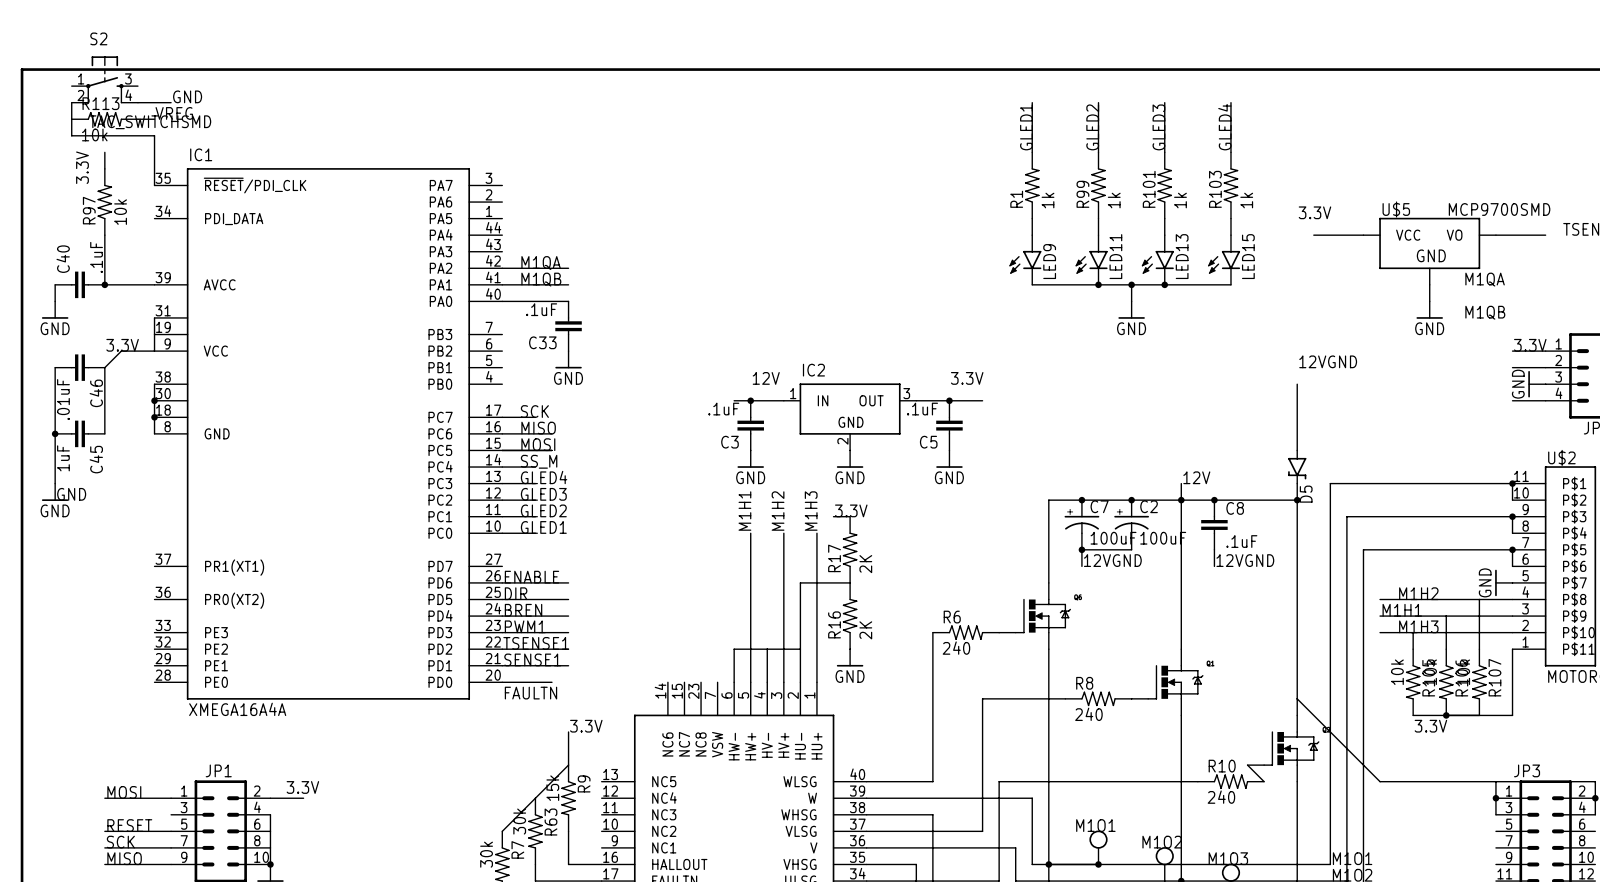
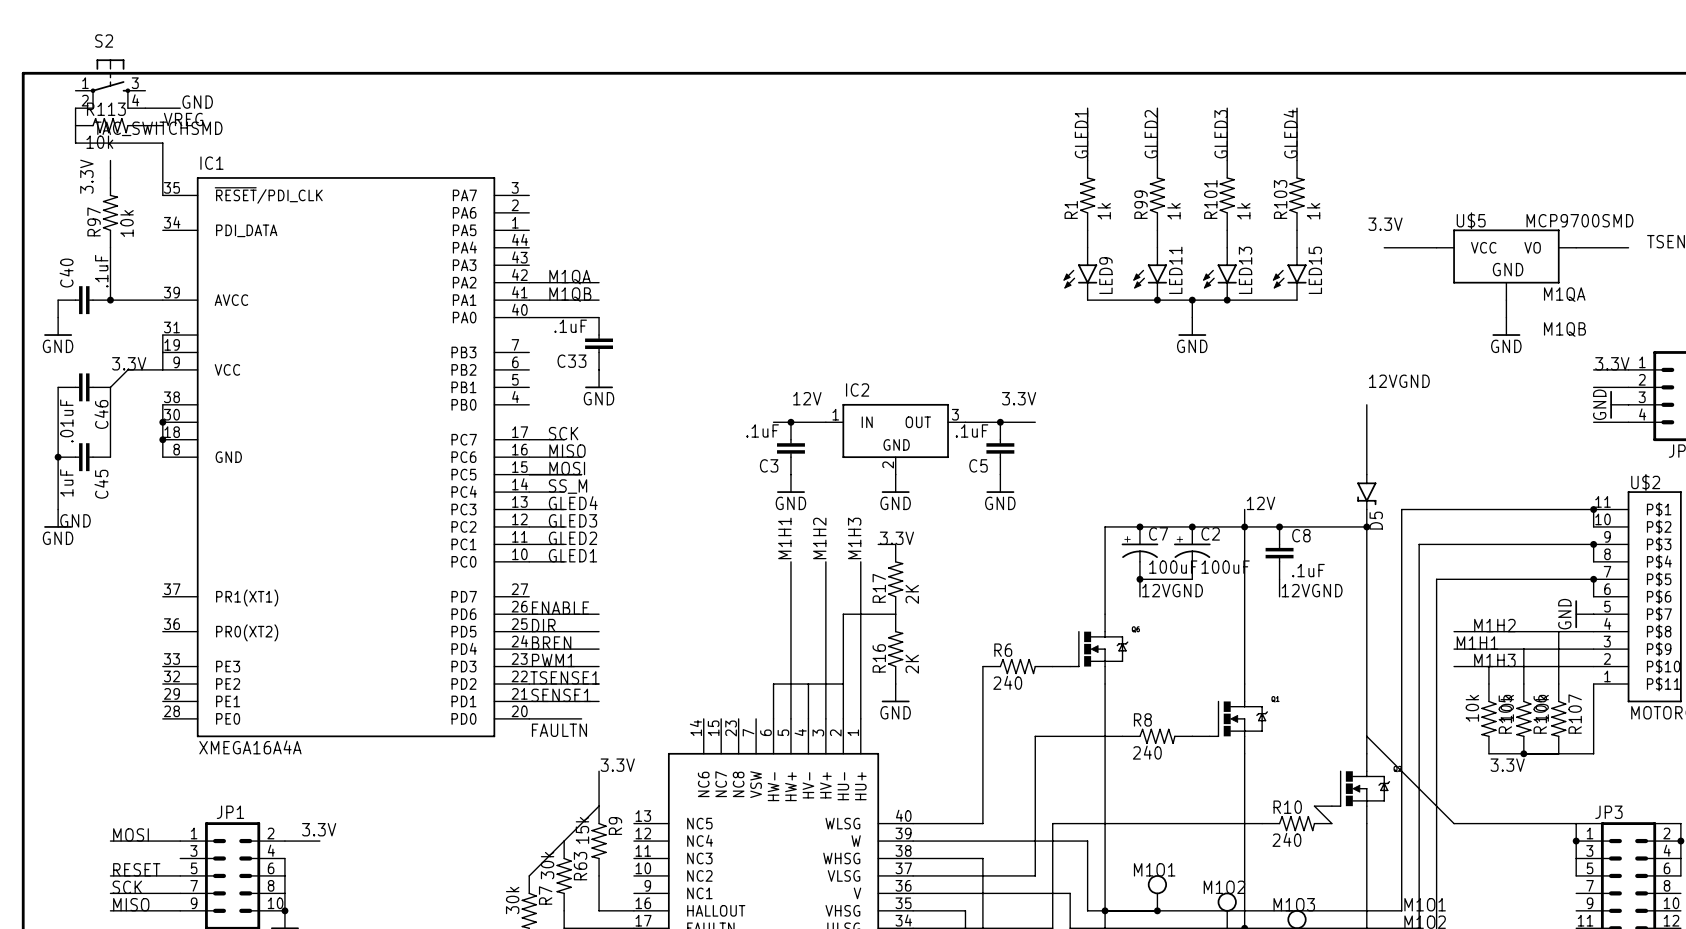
wire: none -> (1576, 858) (1576, 875)
wire: none -> (1680, 858) (1680, 875)

